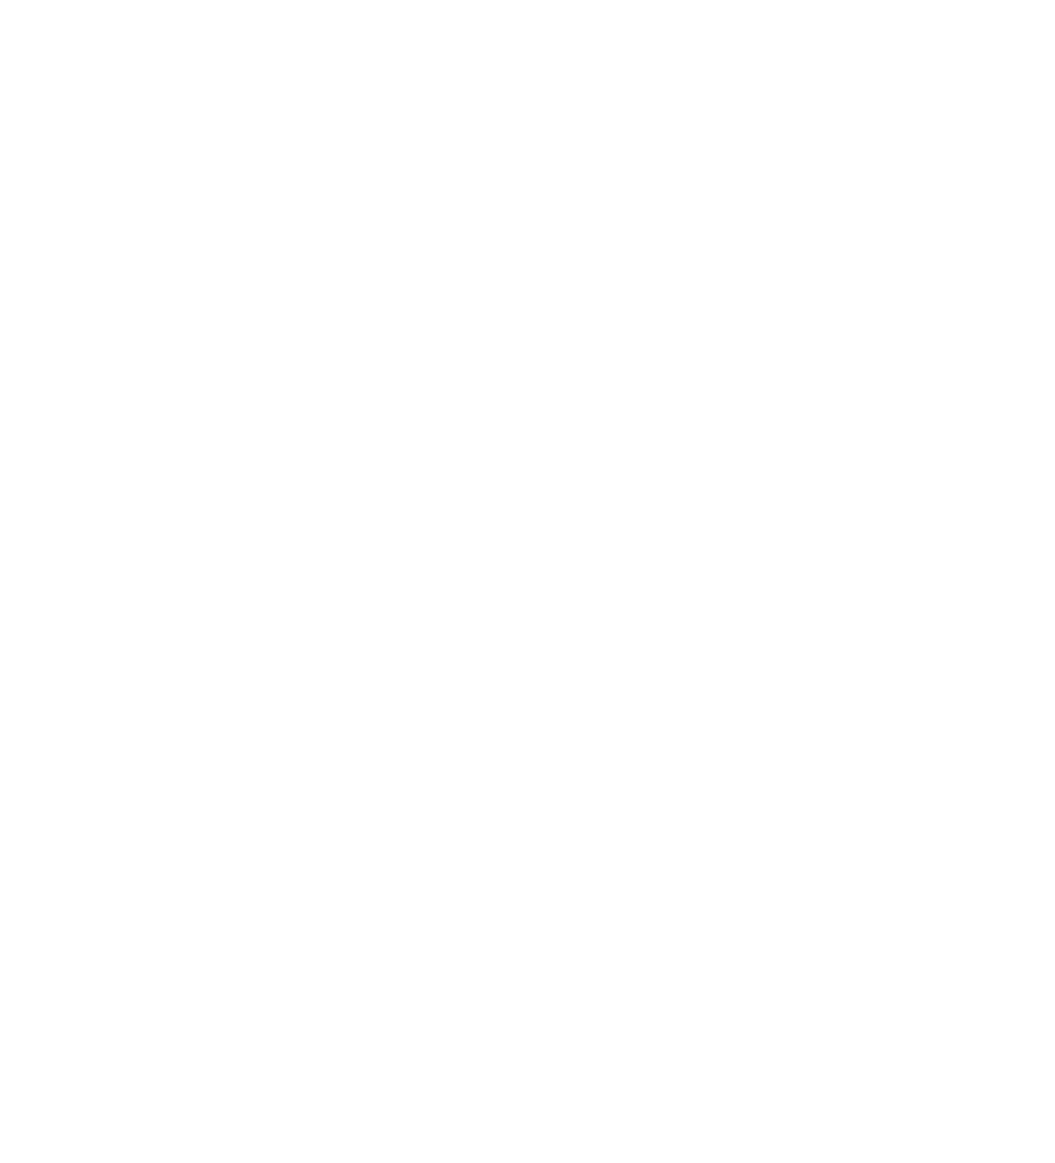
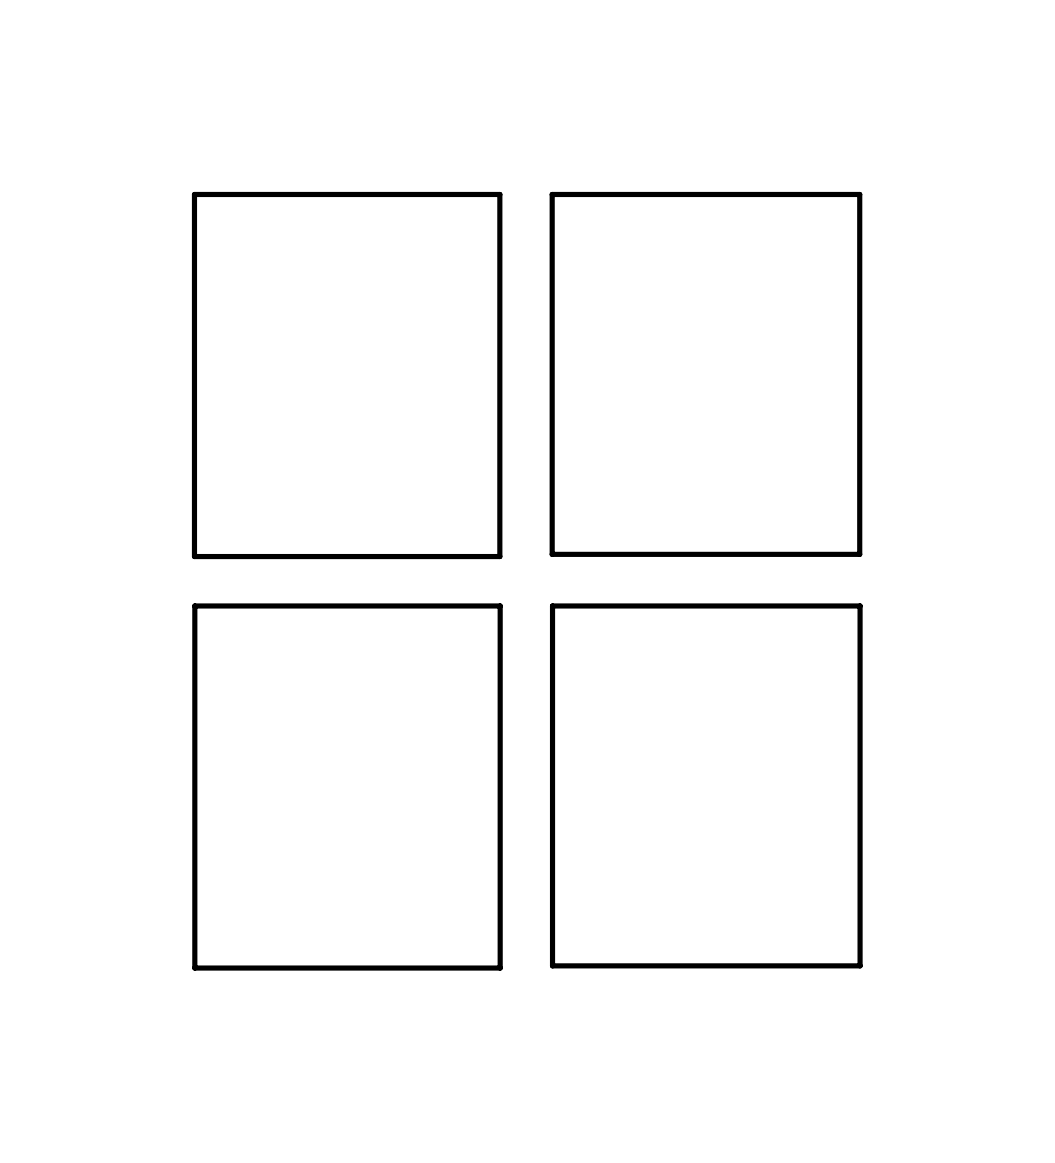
board edge: none -> (194, 194) (194, 556) (499, 556) (499, 194) (194, 194)
board edge: none -> (552, 194) (859, 194) (859, 554) (552, 554) (552, 194)
board edge: none -> (194, 605) (500, 605) (500, 968) (194, 968) (194, 605)
board edge: none -> (552, 605) (552, 965) (860, 965) (860, 605) (552, 605)

